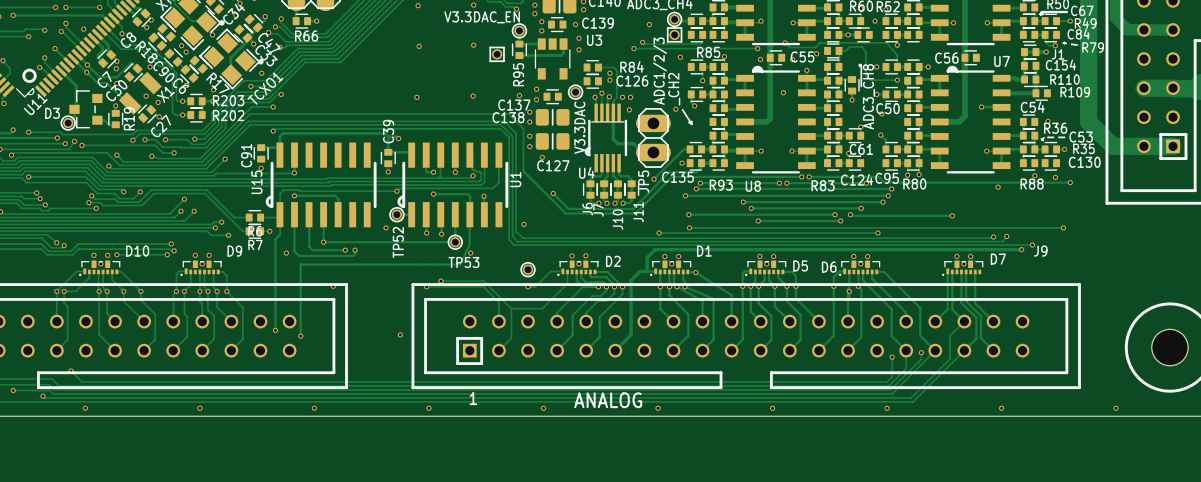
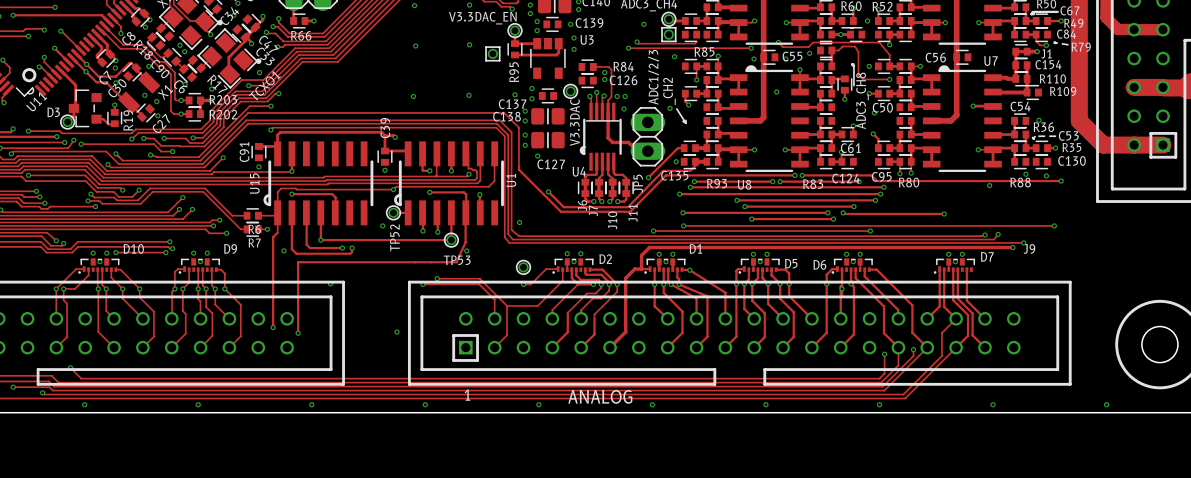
track: (65, 7) (99, 7) -> none
via: (65, 7) -> none
via: (99, 7) -> none
track: (65, 23) (65, 27) (85, 46) -> none
via: (65, 23) -> none
via: (83, 29) -> none

